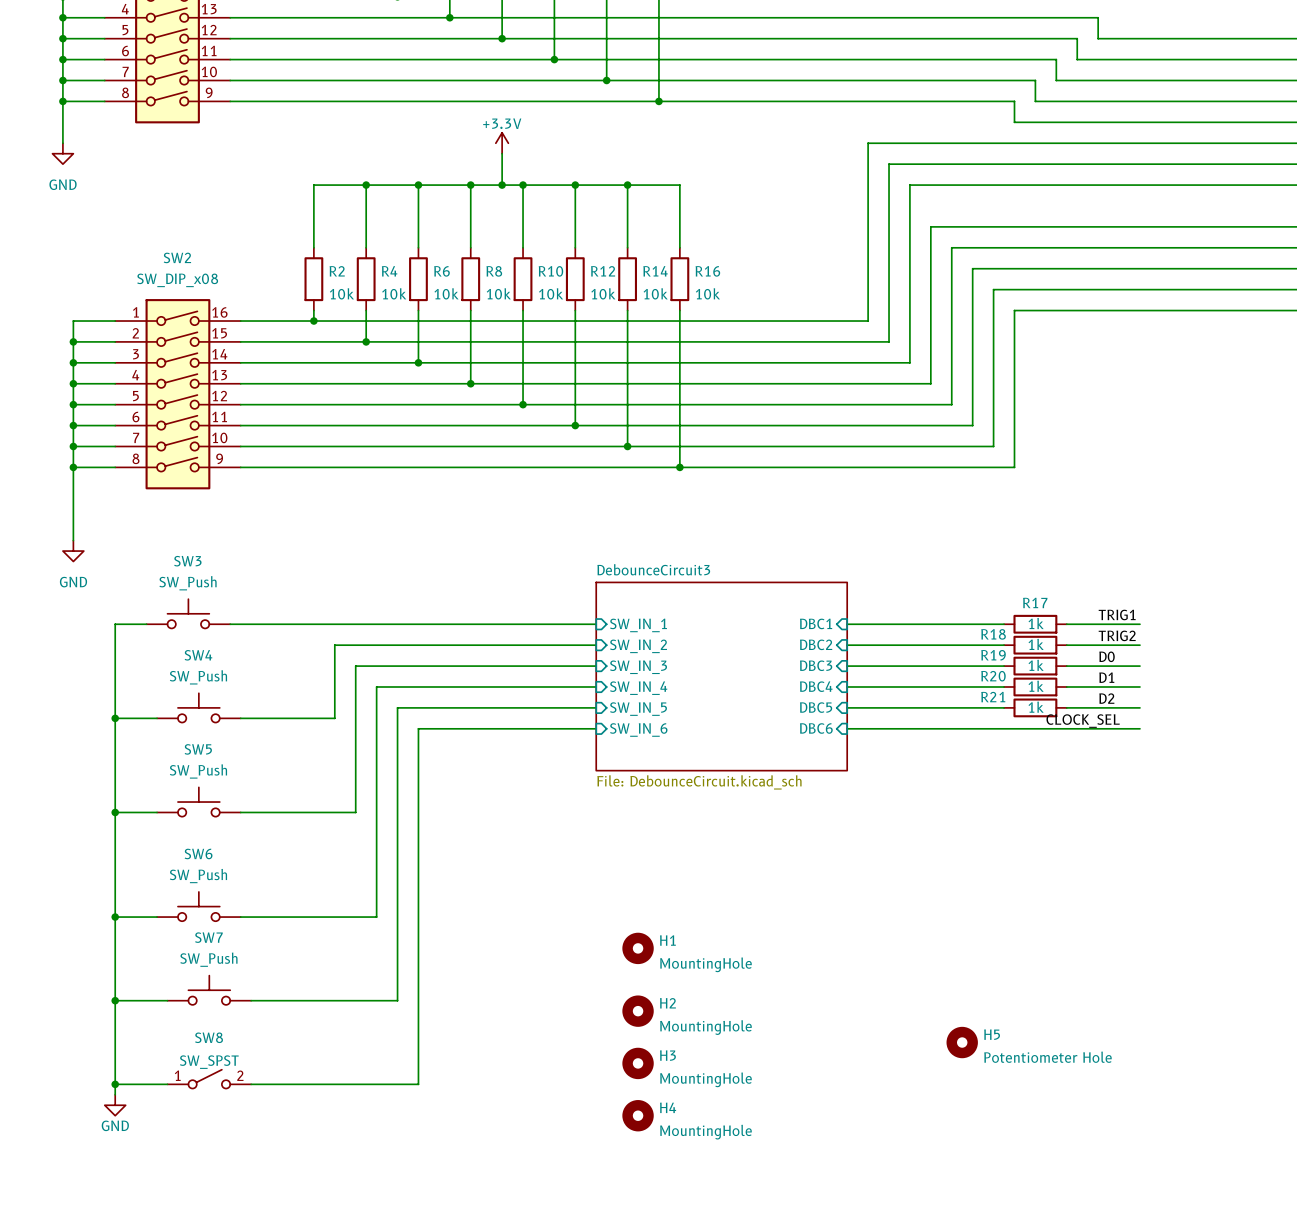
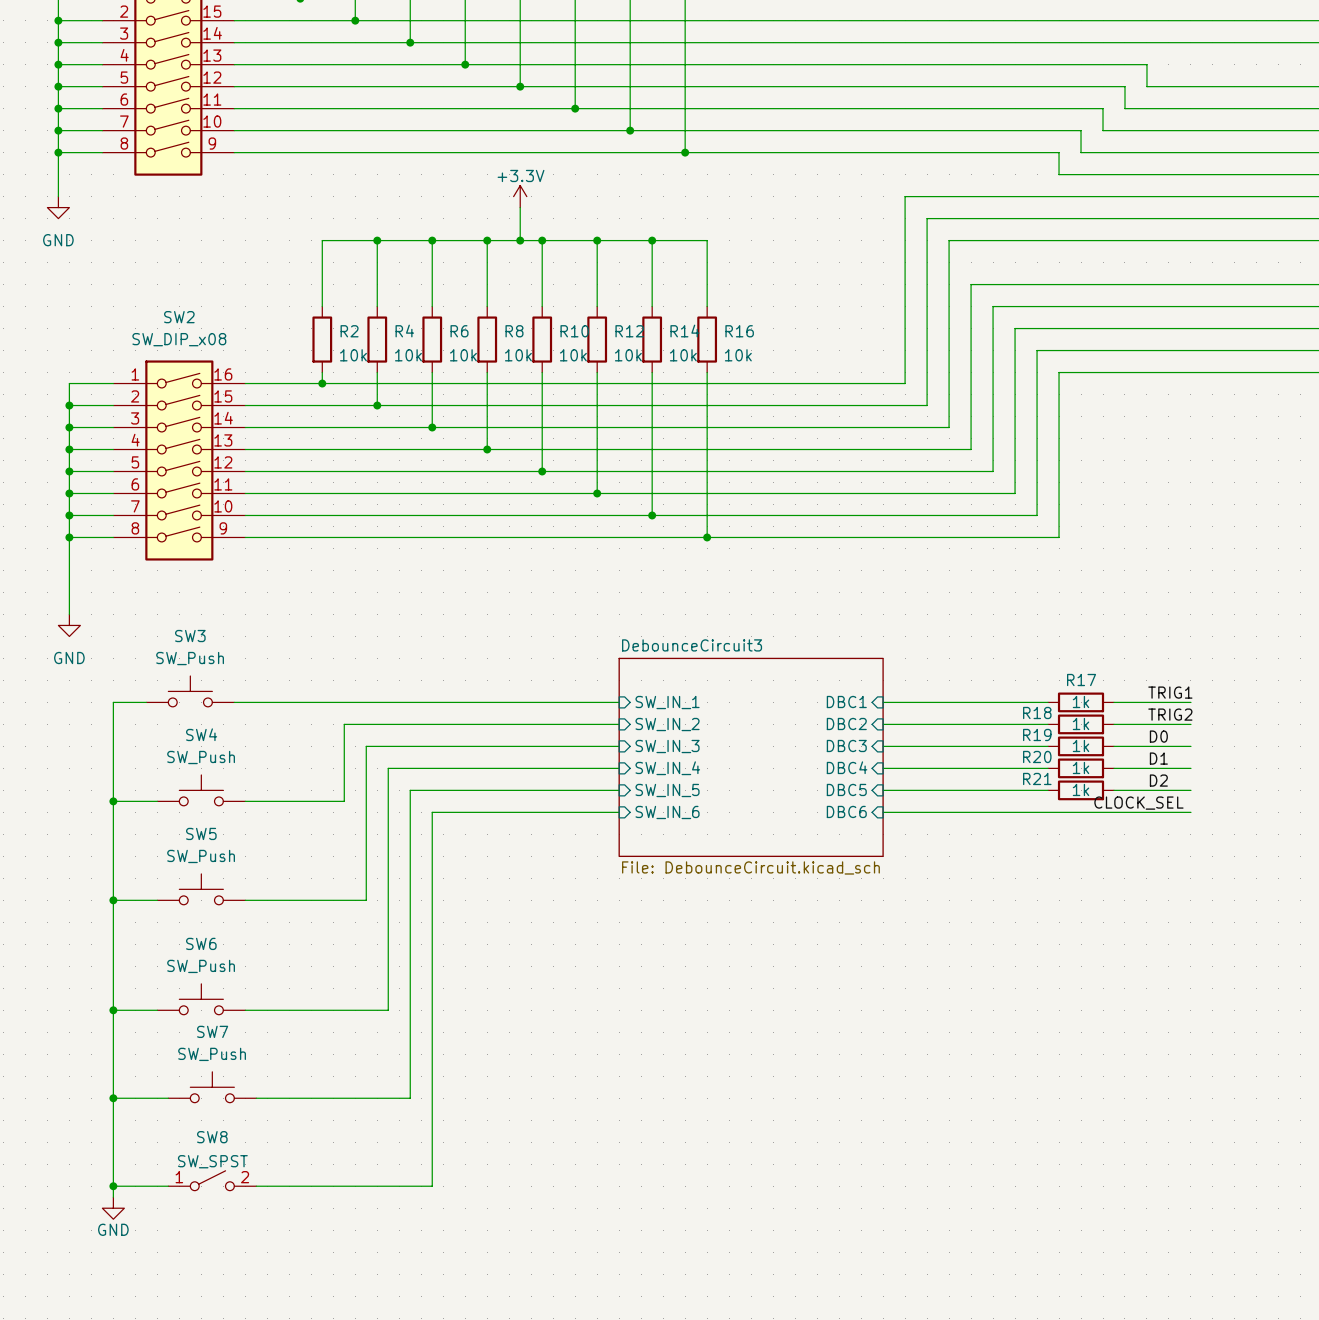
H1: MountingHole (638, 948) -> none
H2: MountingHole (638, 1011) -> none
H5: Potentiometer Hole (962, 1042) -> none
H3: MountingHole (638, 1063) -> none
H4: MountingHole (638, 1115) -> none

